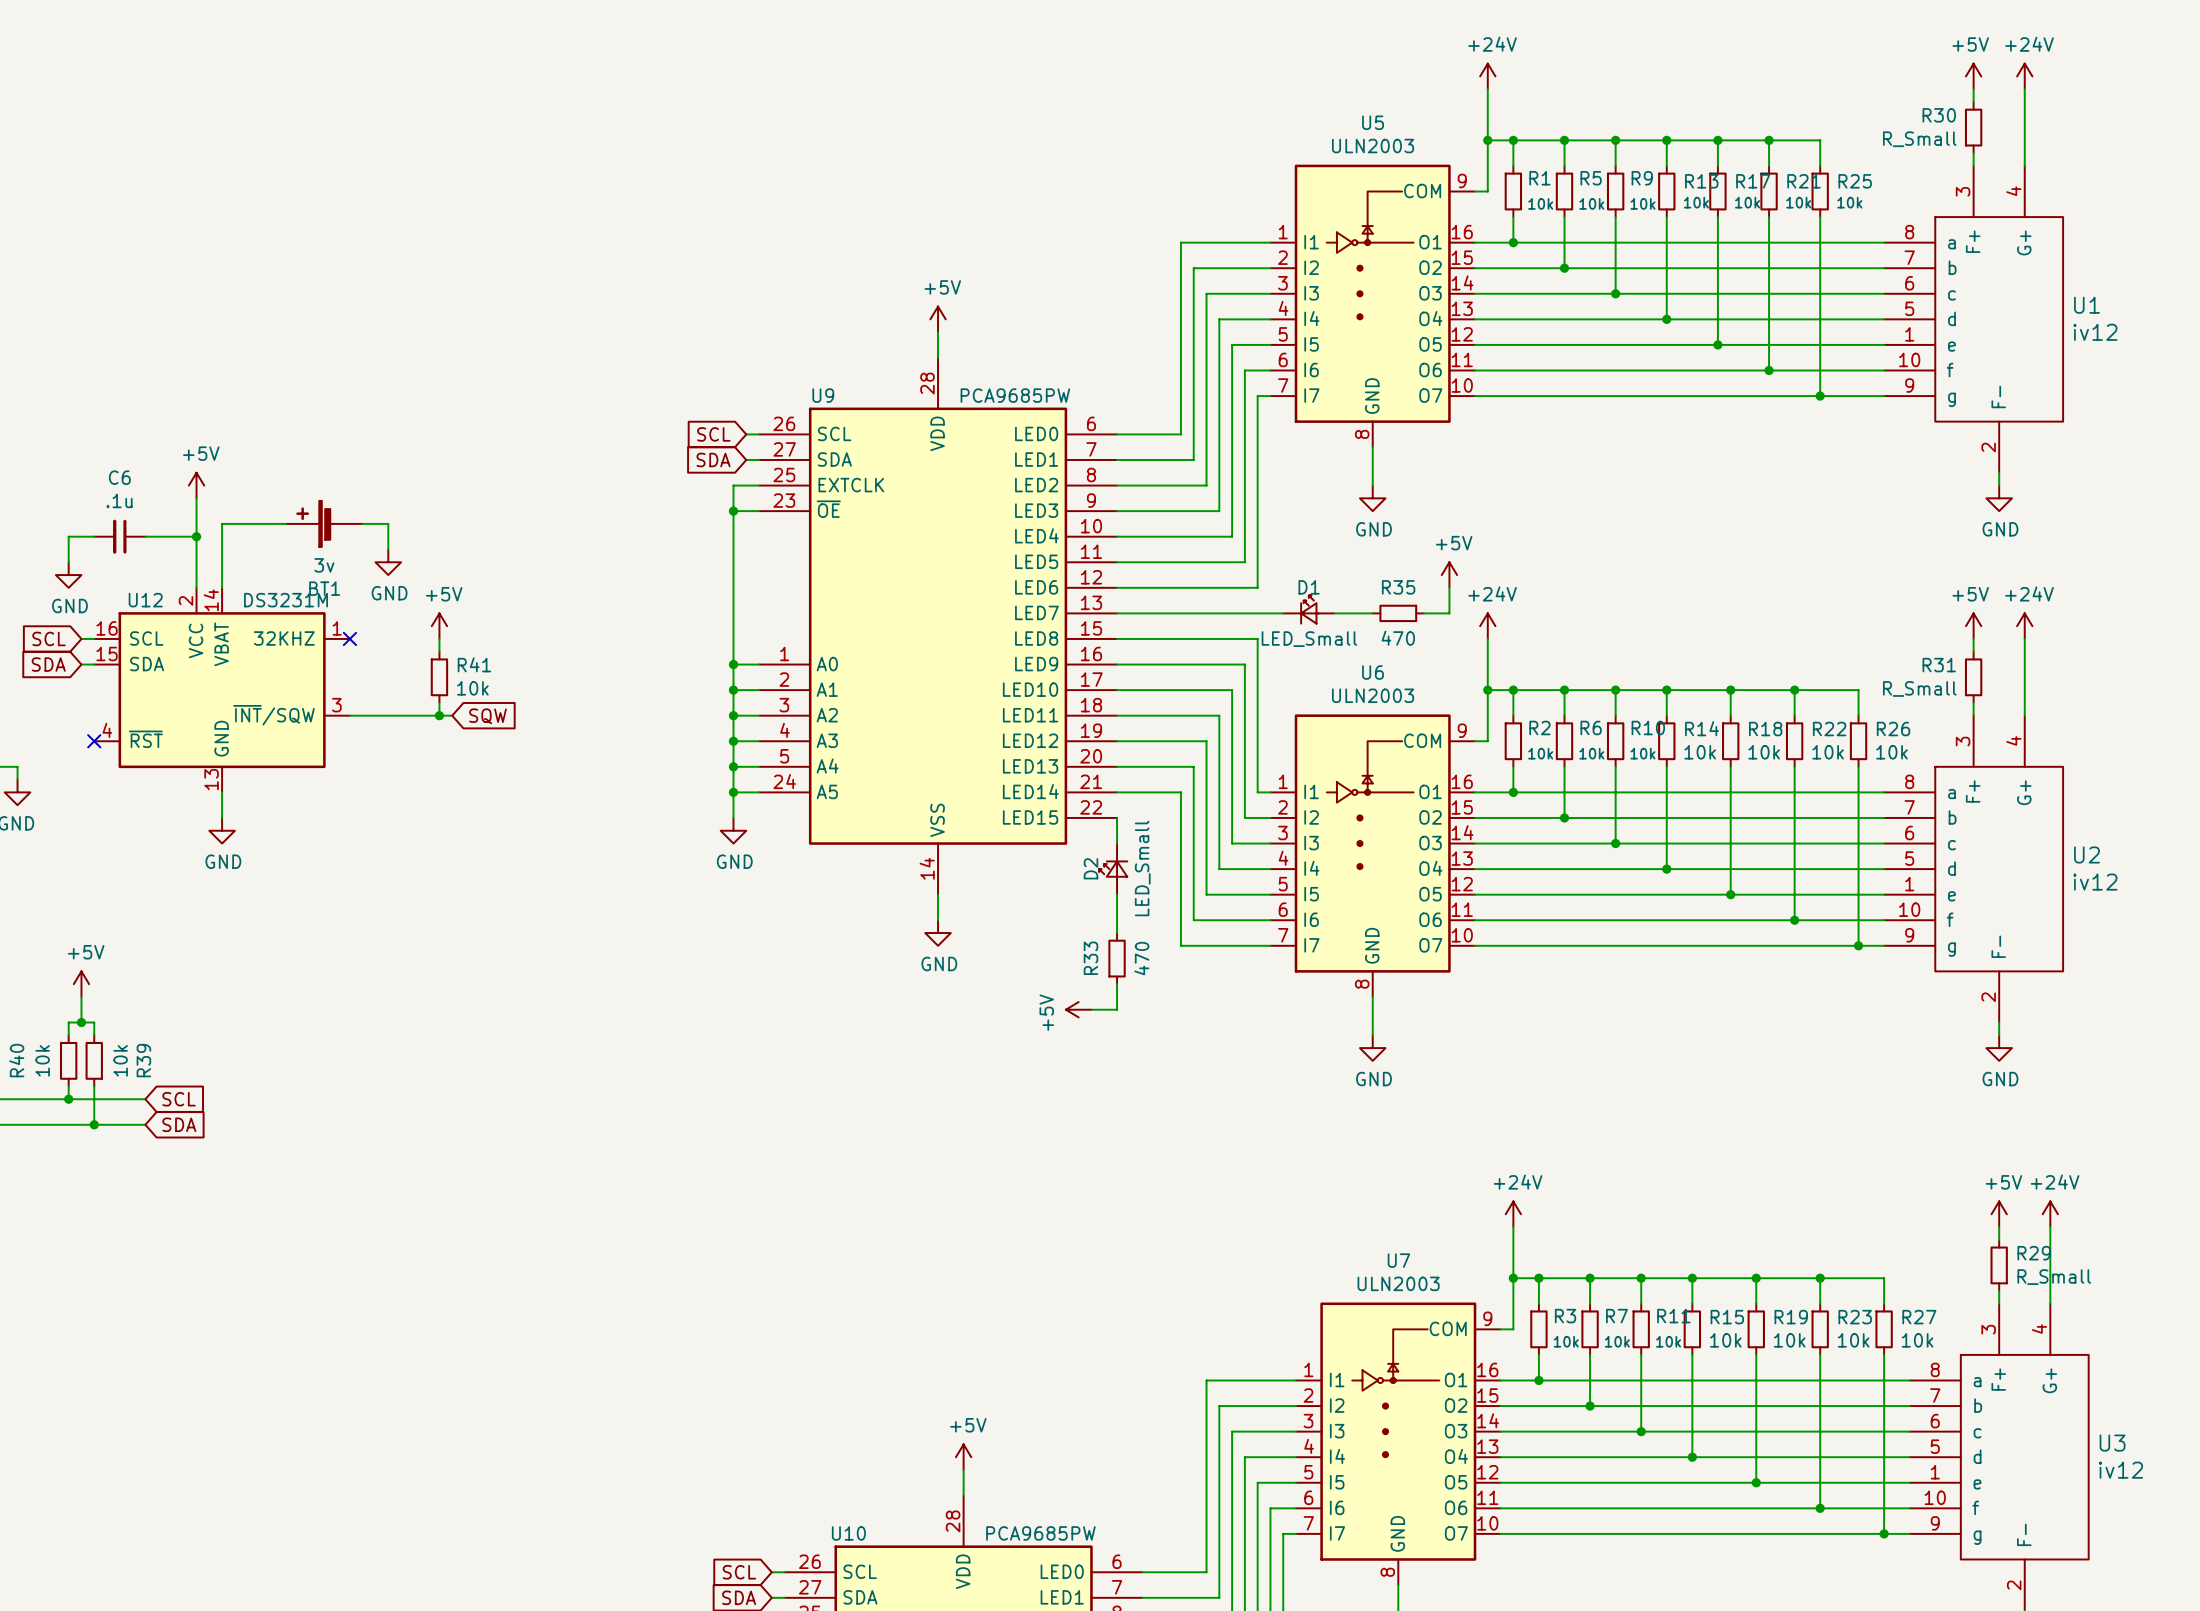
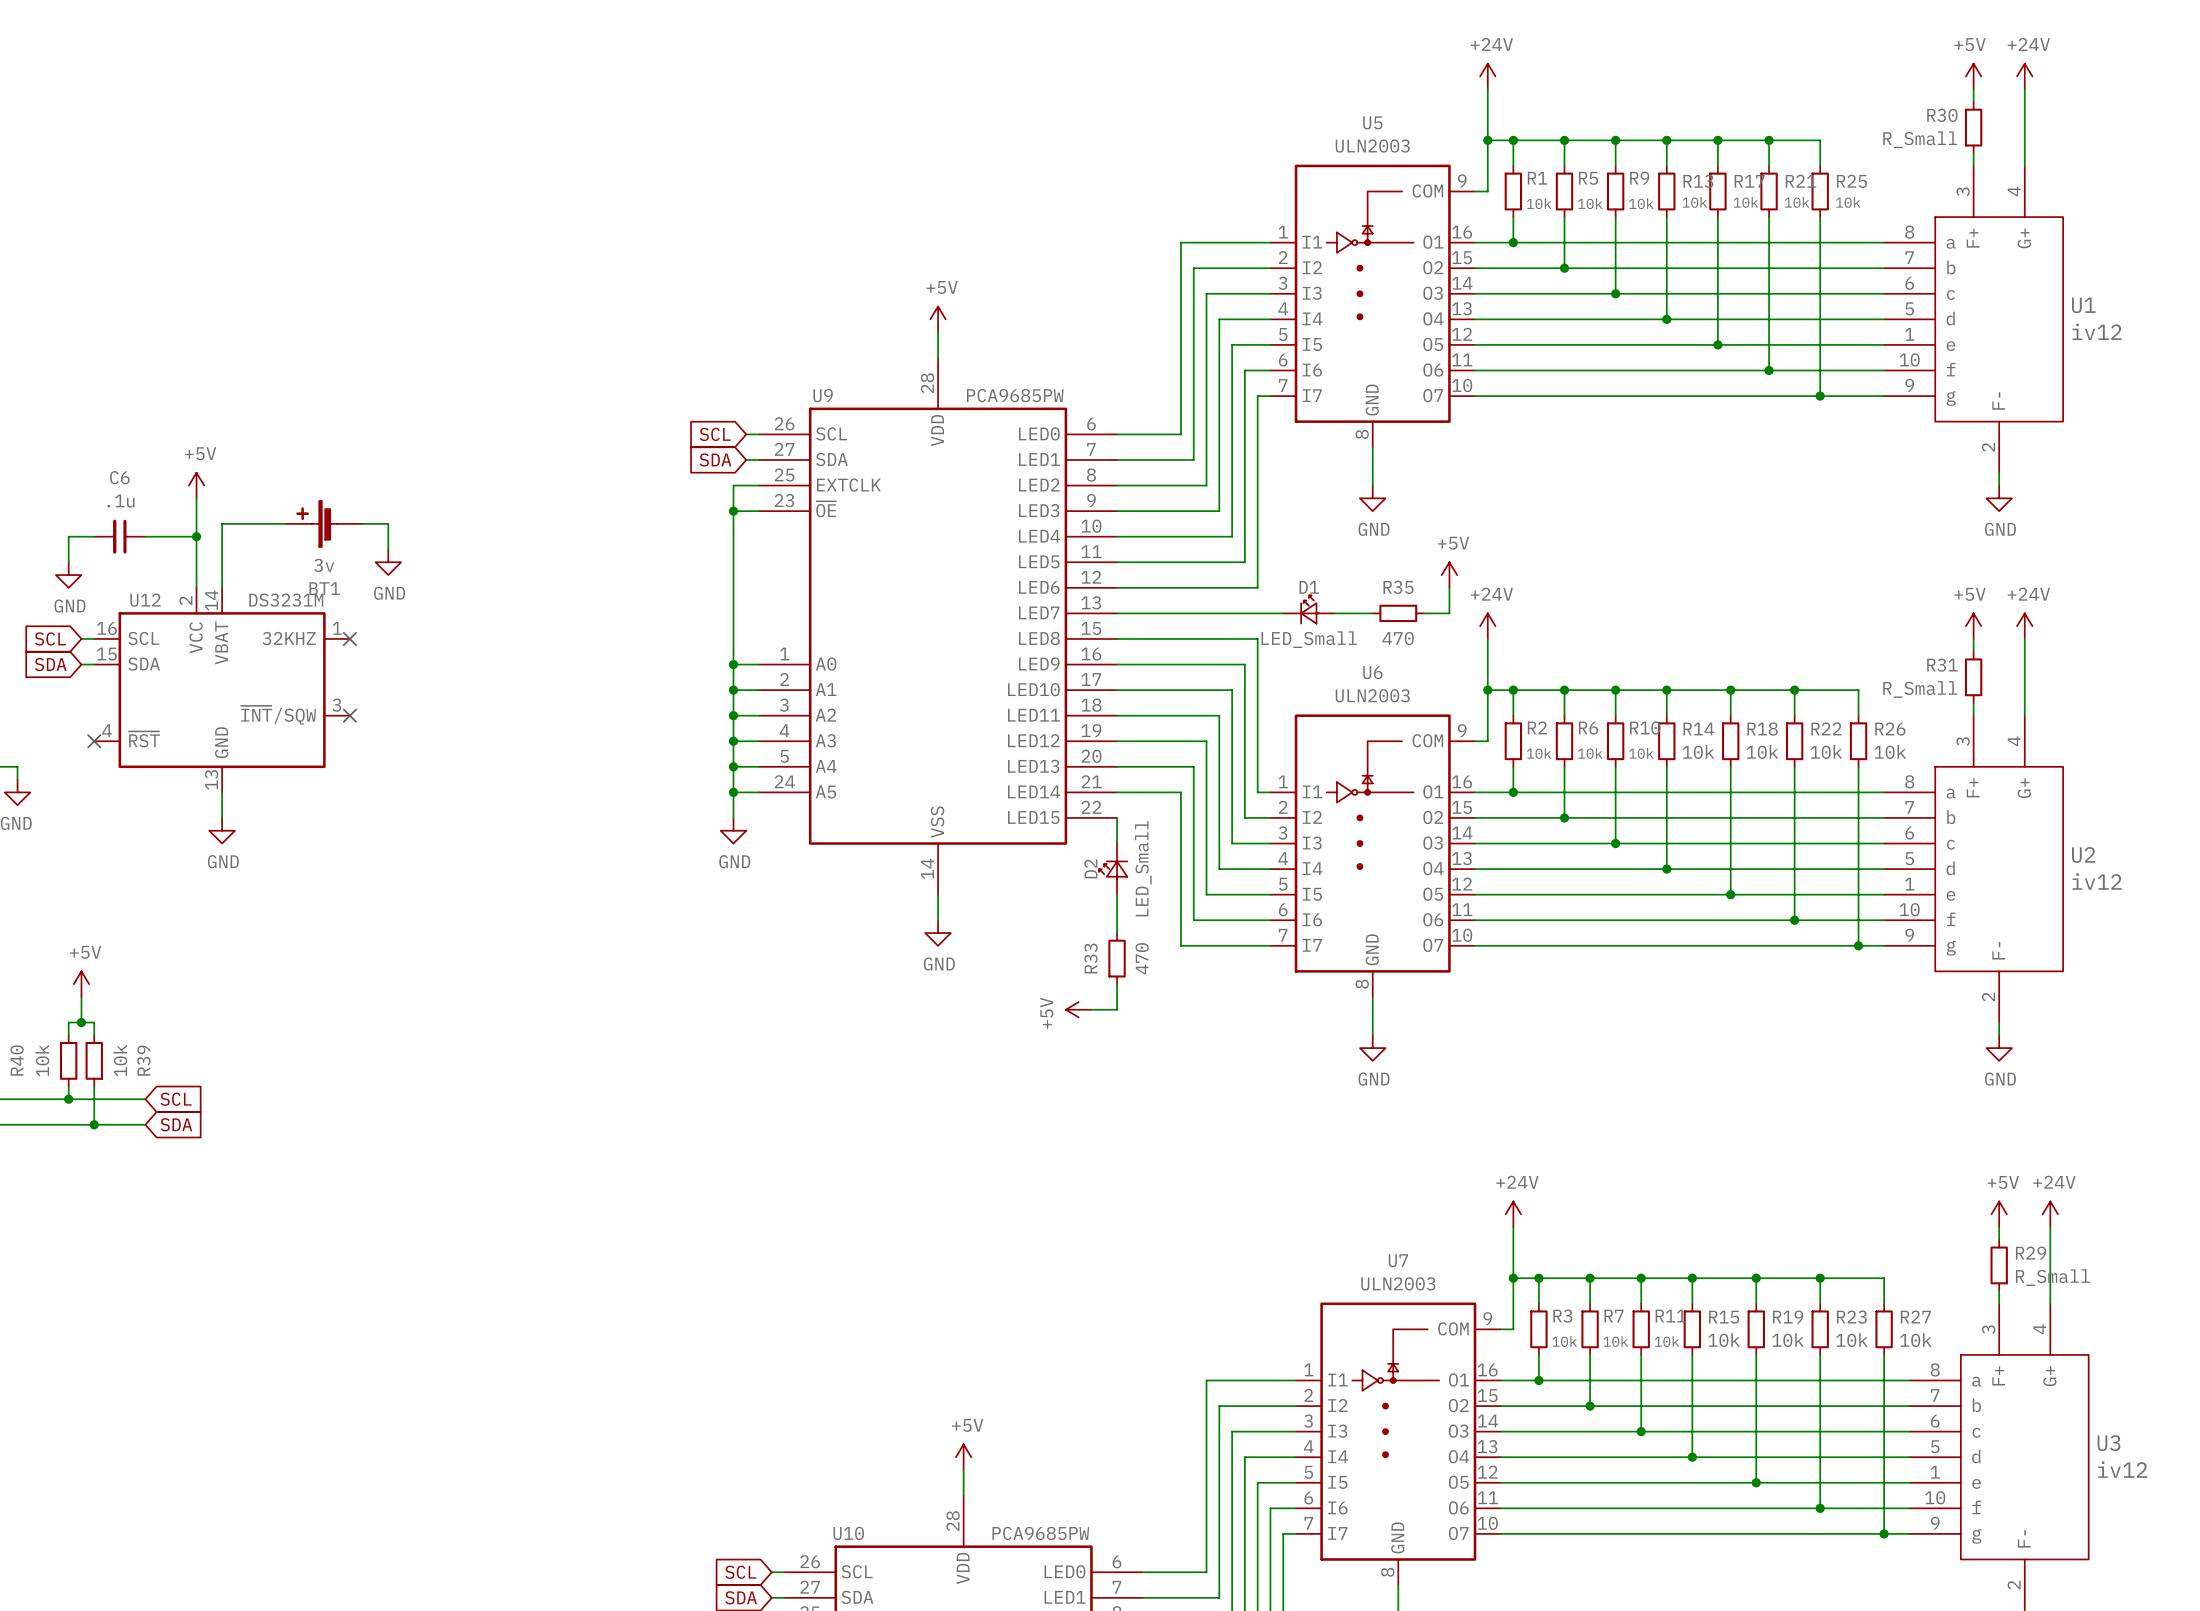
power symbol: +5V (439, 626) -> none
wire: (439, 638) (439, 651) -> none
R41: 10k (439, 677) -> none
wire: (439, 702) (439, 715) -> none
wire: (349, 715) (452, 715) -> none
no-connect mark: none -> (349, 715)
junction: (439, 715) -> none
global label: SQW (488, 716) -> none

